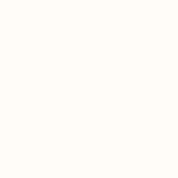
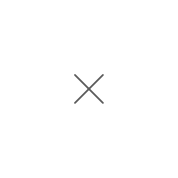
no-connect mark: none -> (88, 88)

